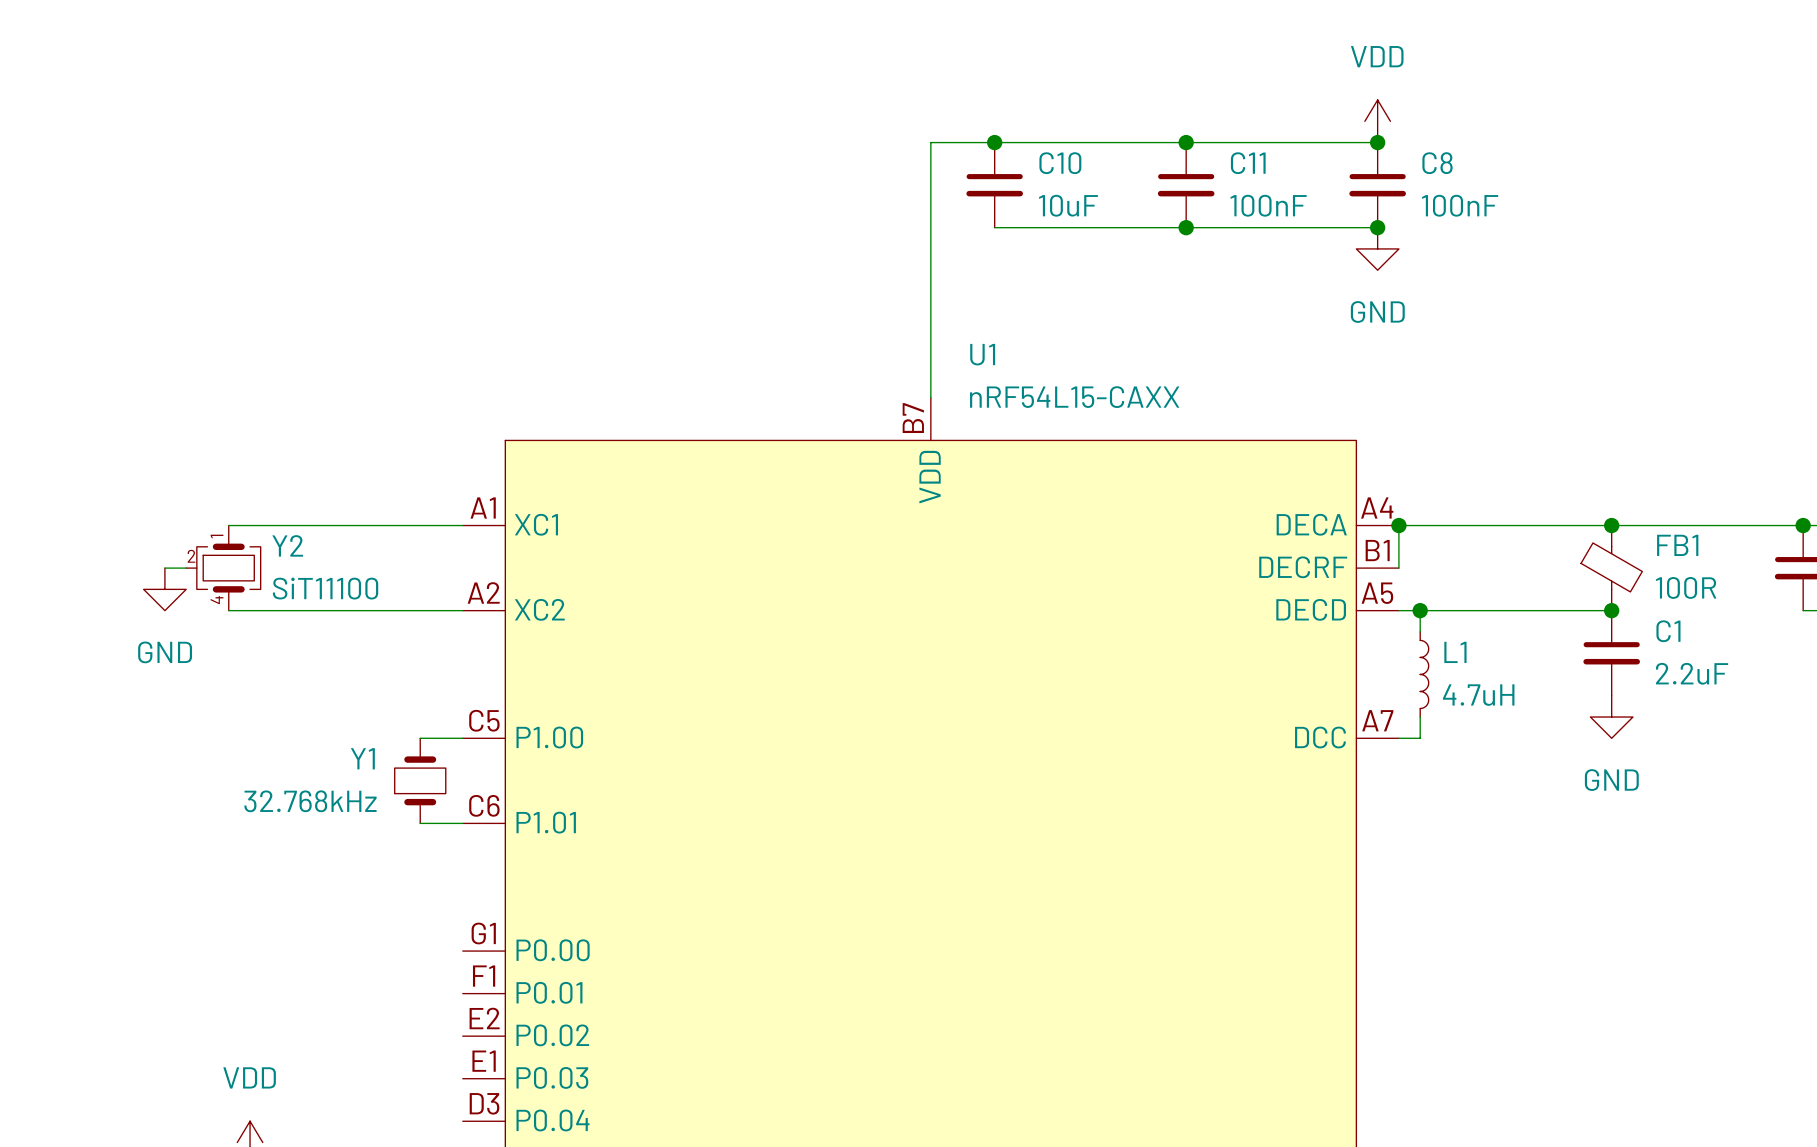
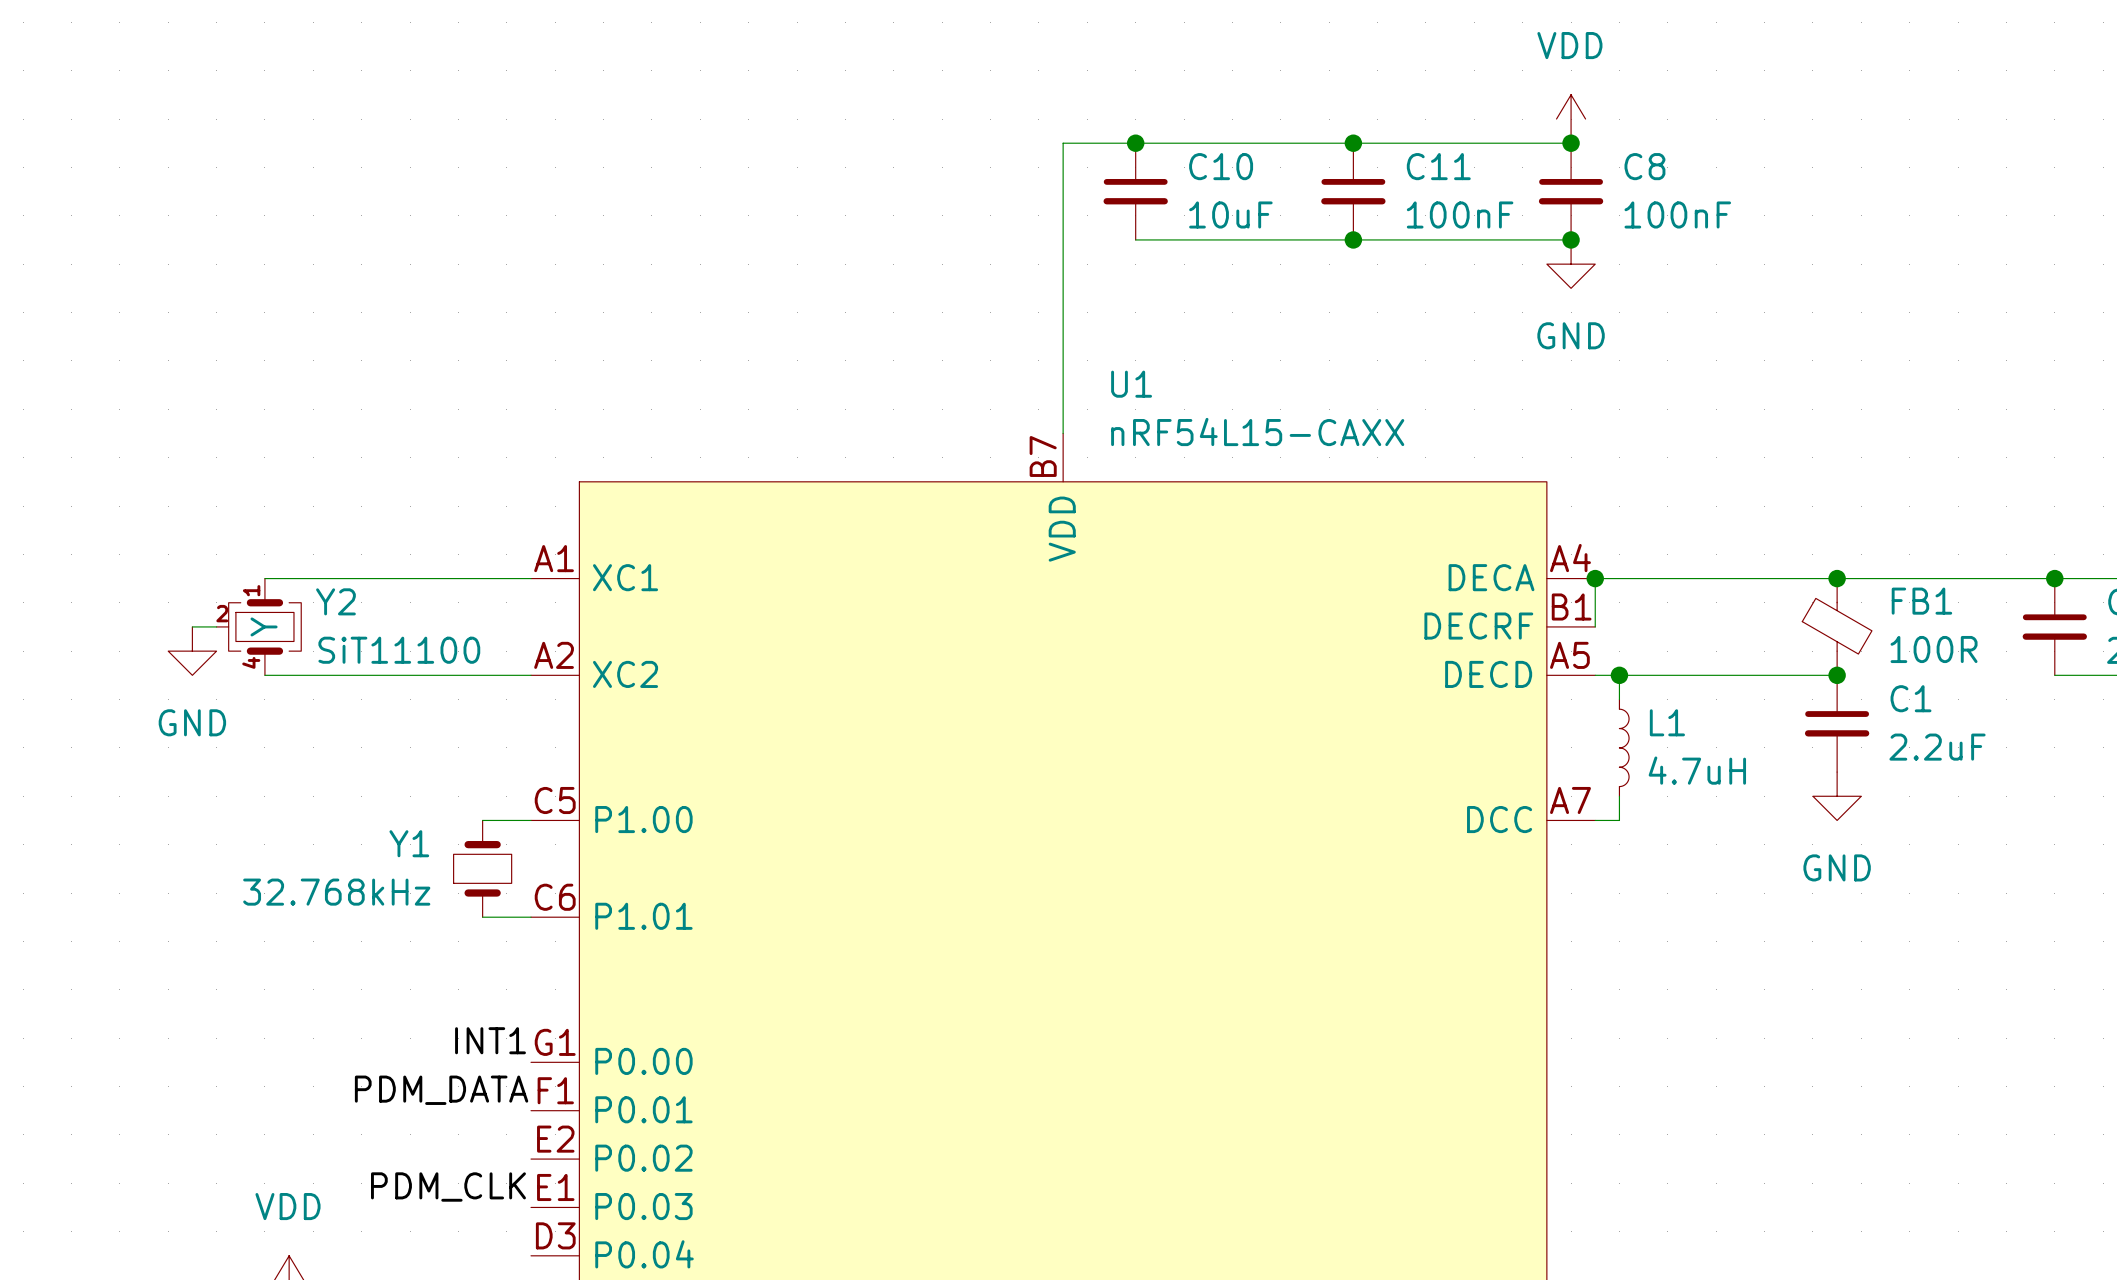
Y2 text: none -> Y (264, 626)
label: none -> INT1 (490, 1040)
label: none -> PDM_DATA (441, 1090)
label: none -> PDM_CLK (448, 1187)

